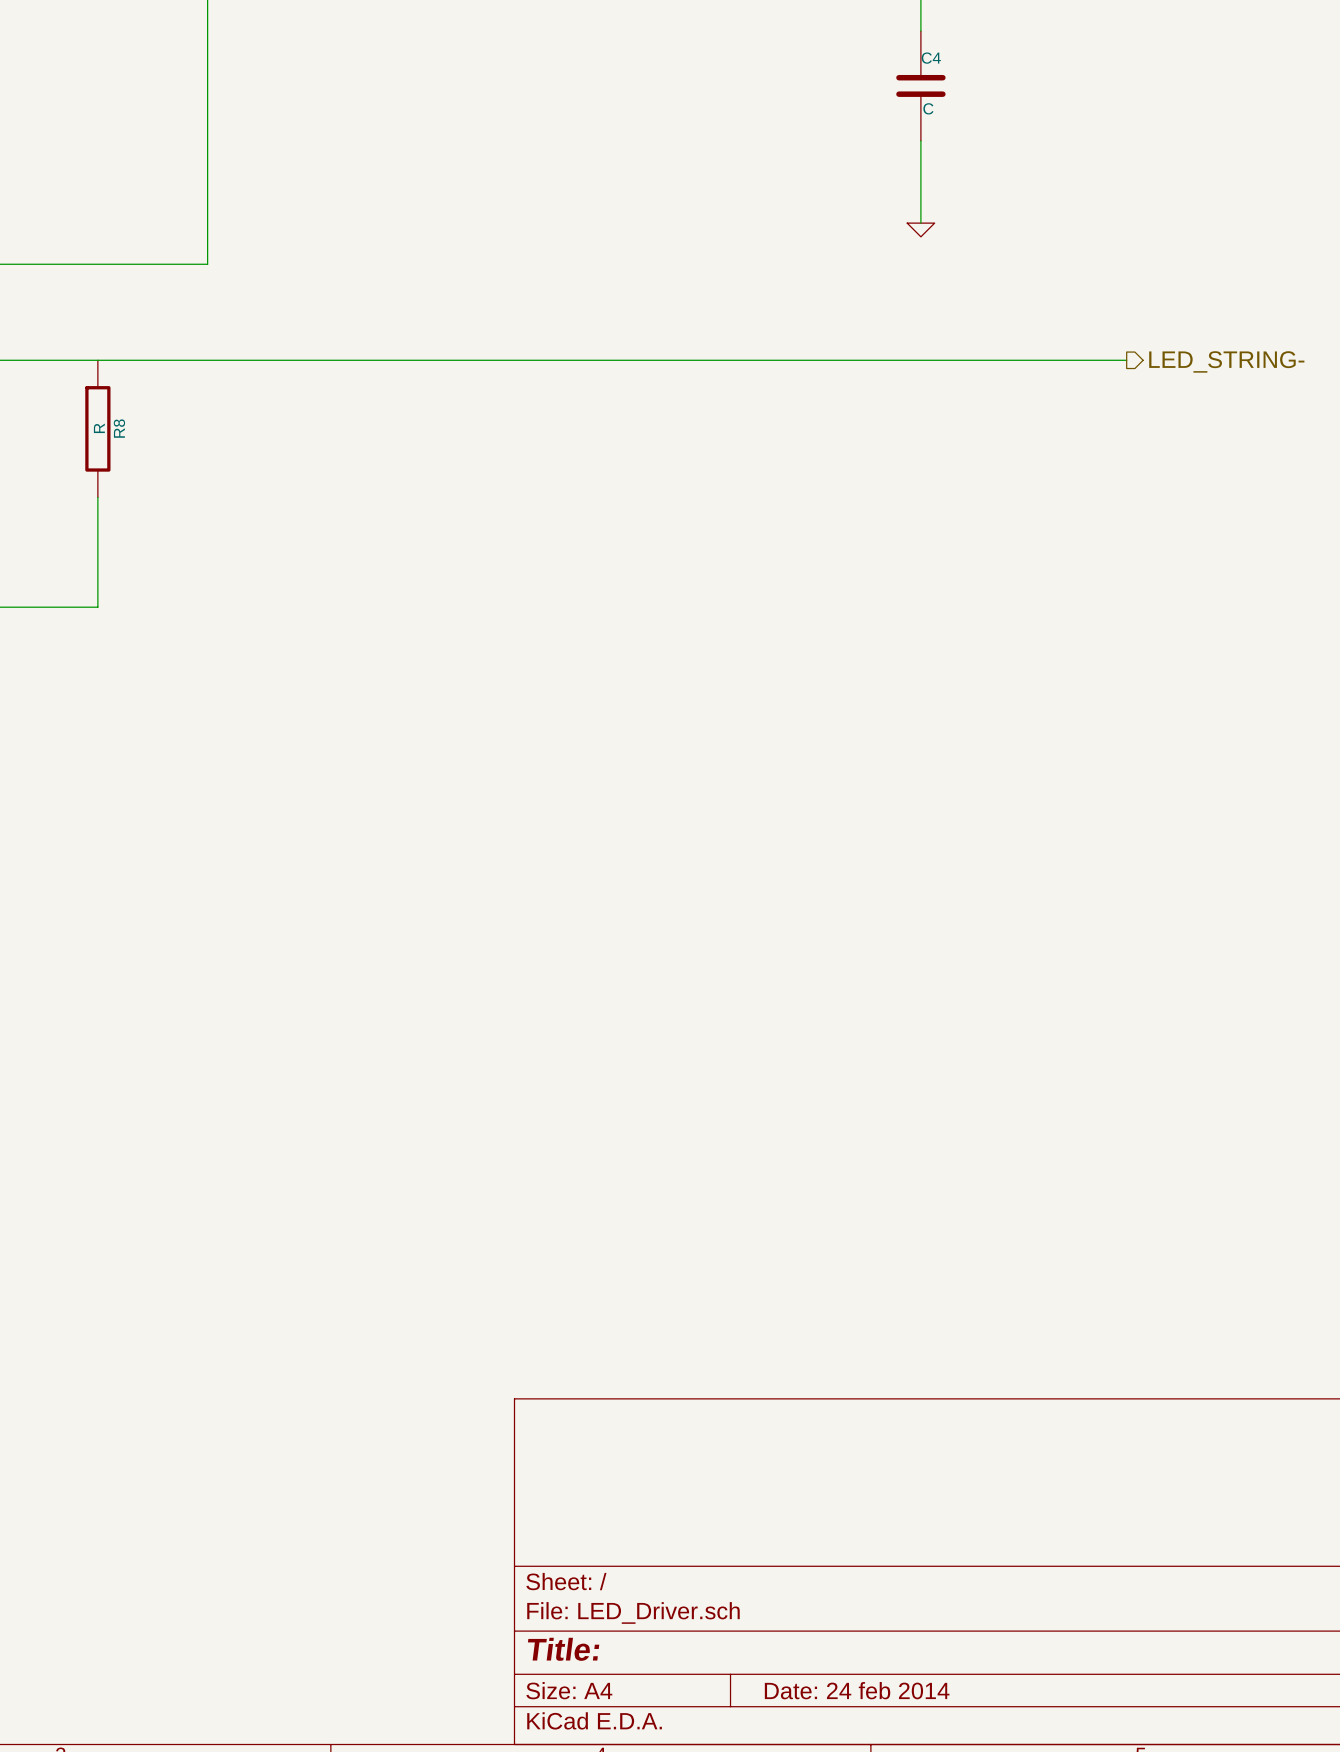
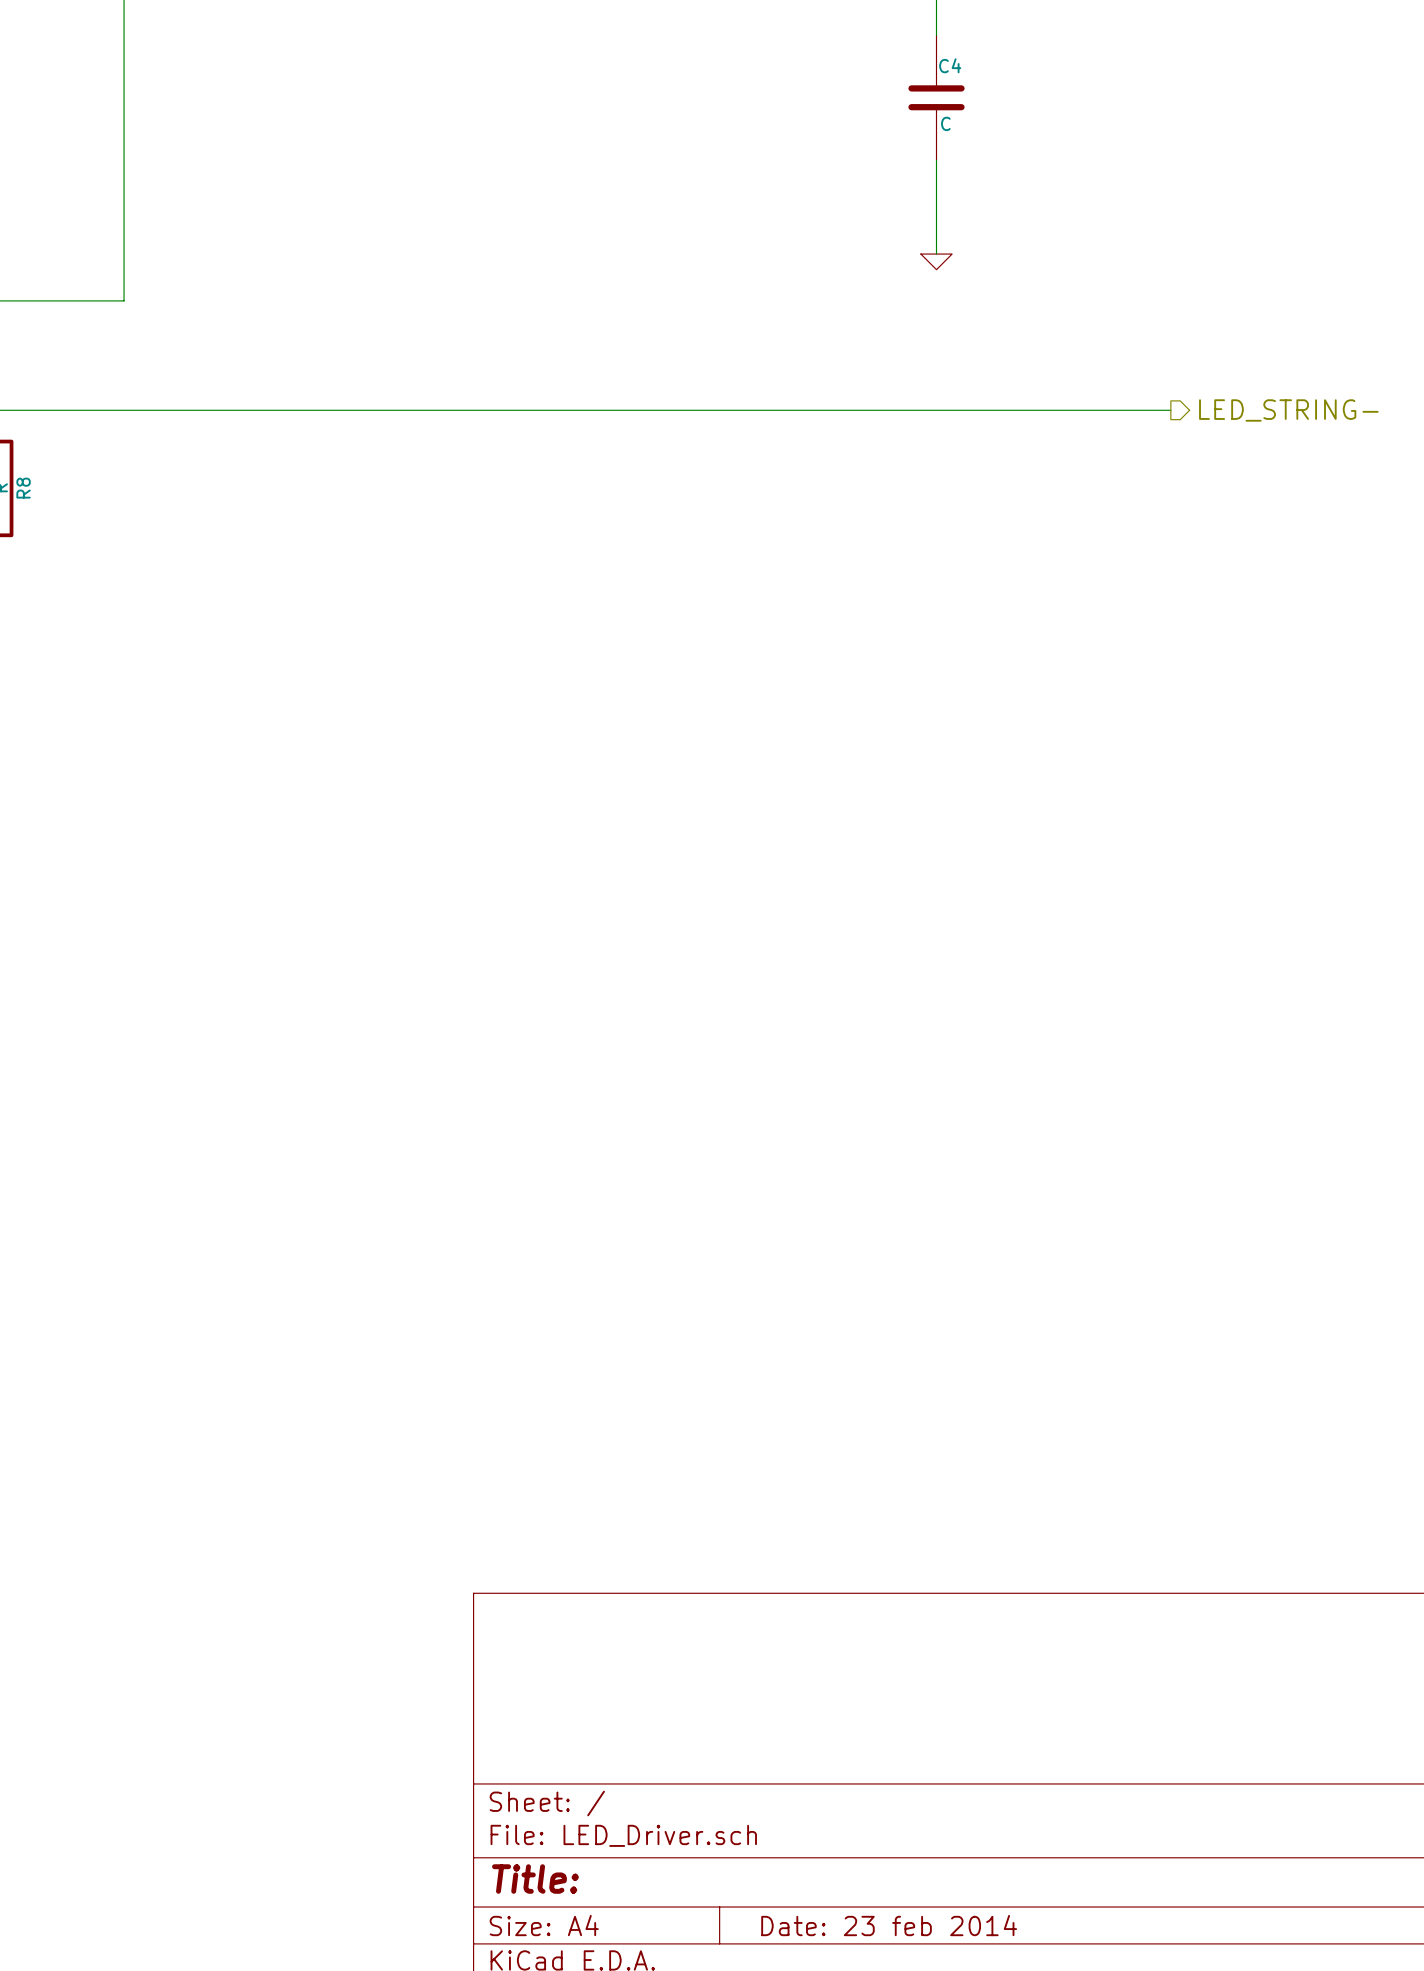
title block: Date: 24 feb 2014 (857, 1690) -> Date: 23 feb 2014 (889, 1925)

